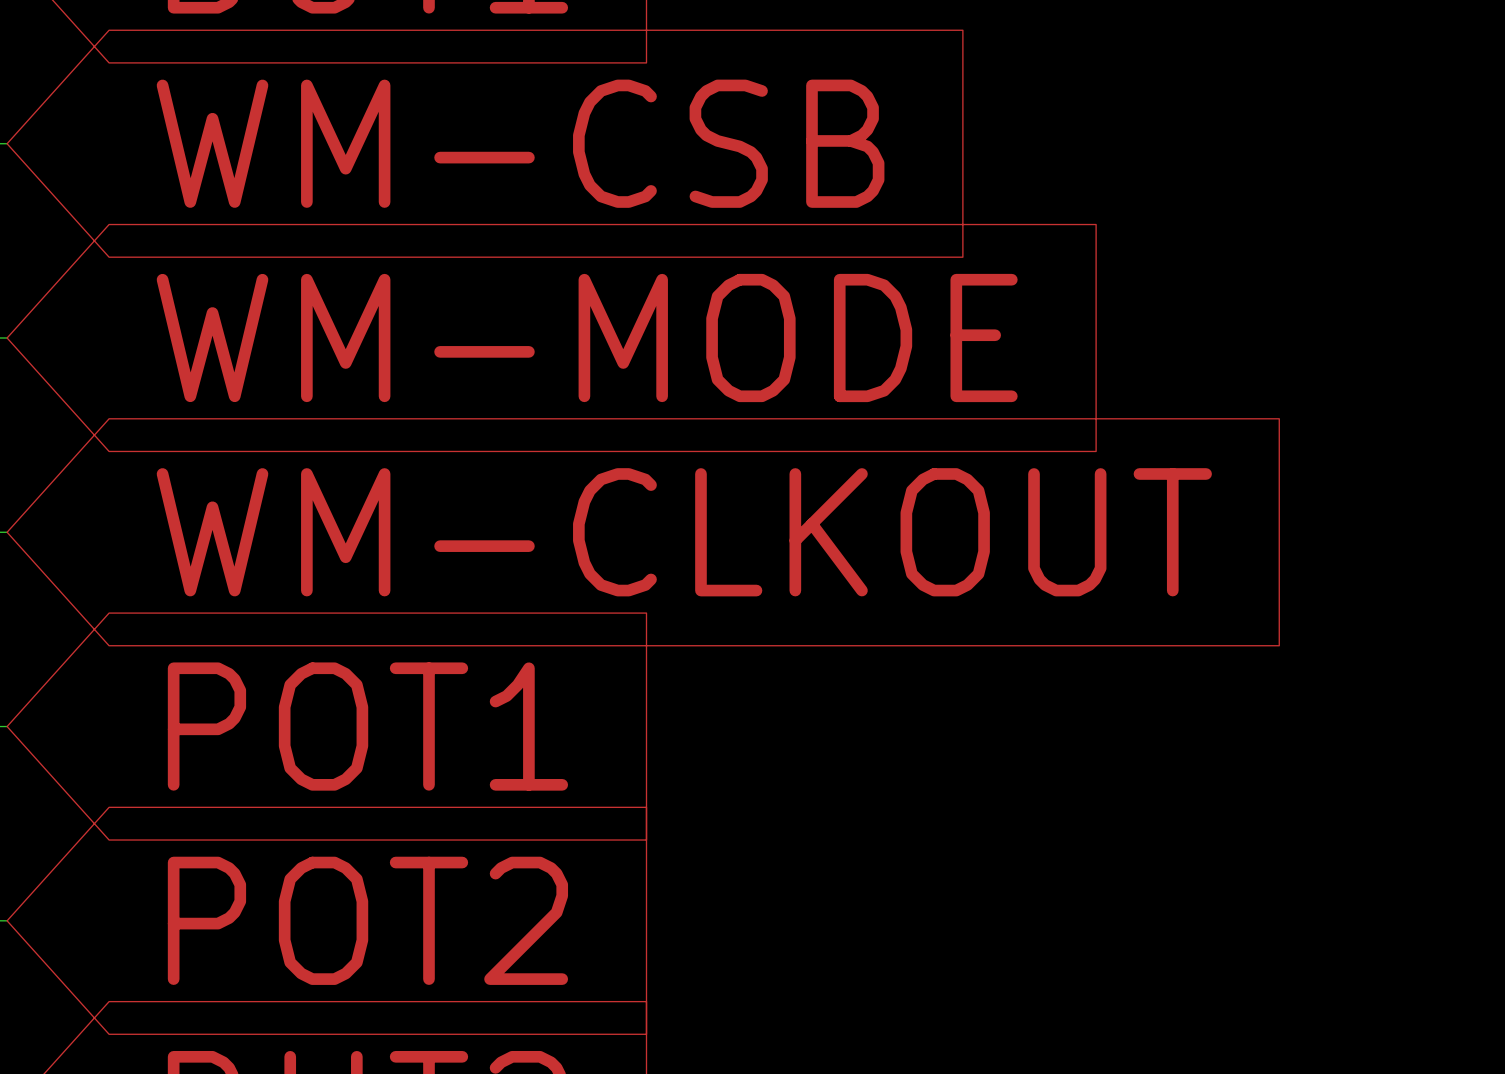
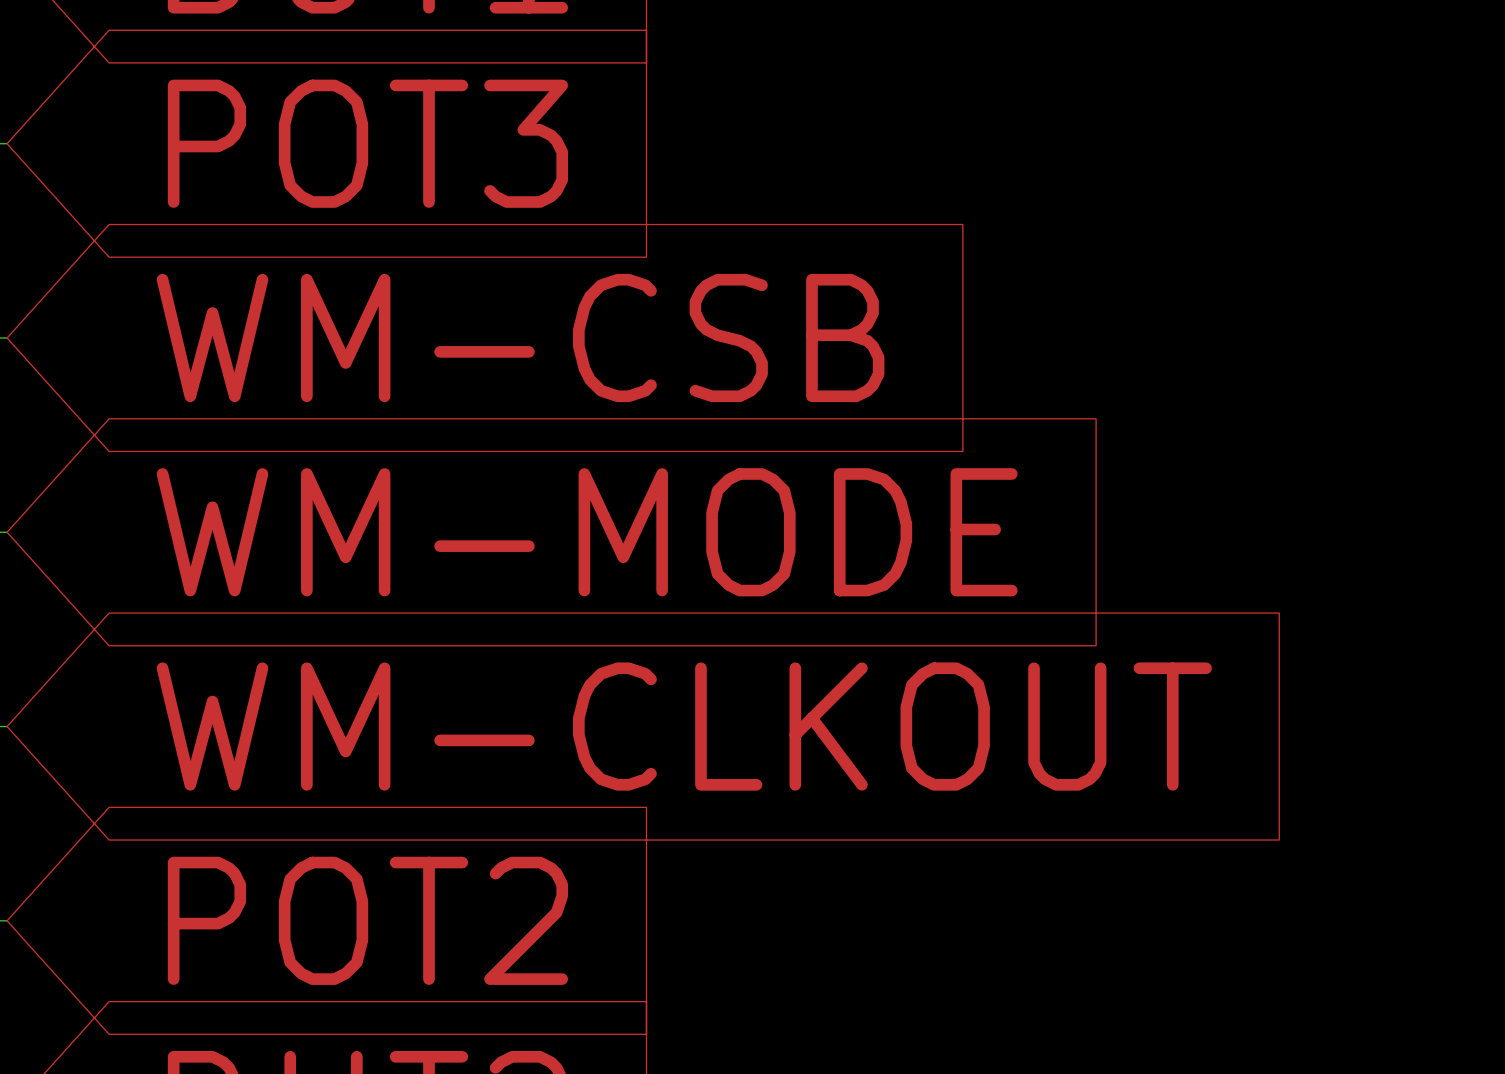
global label: WM-CSB (520, 143) -> POT3 (367, 143)
global label: WM-MODE (587, 337) -> WM-CSB (520, 337)
global label: WM-CLKOUT (684, 532) -> WM-MODE (587, 532)
global label: POT1 (367, 726) -> WM-CLKOUT (684, 726)

